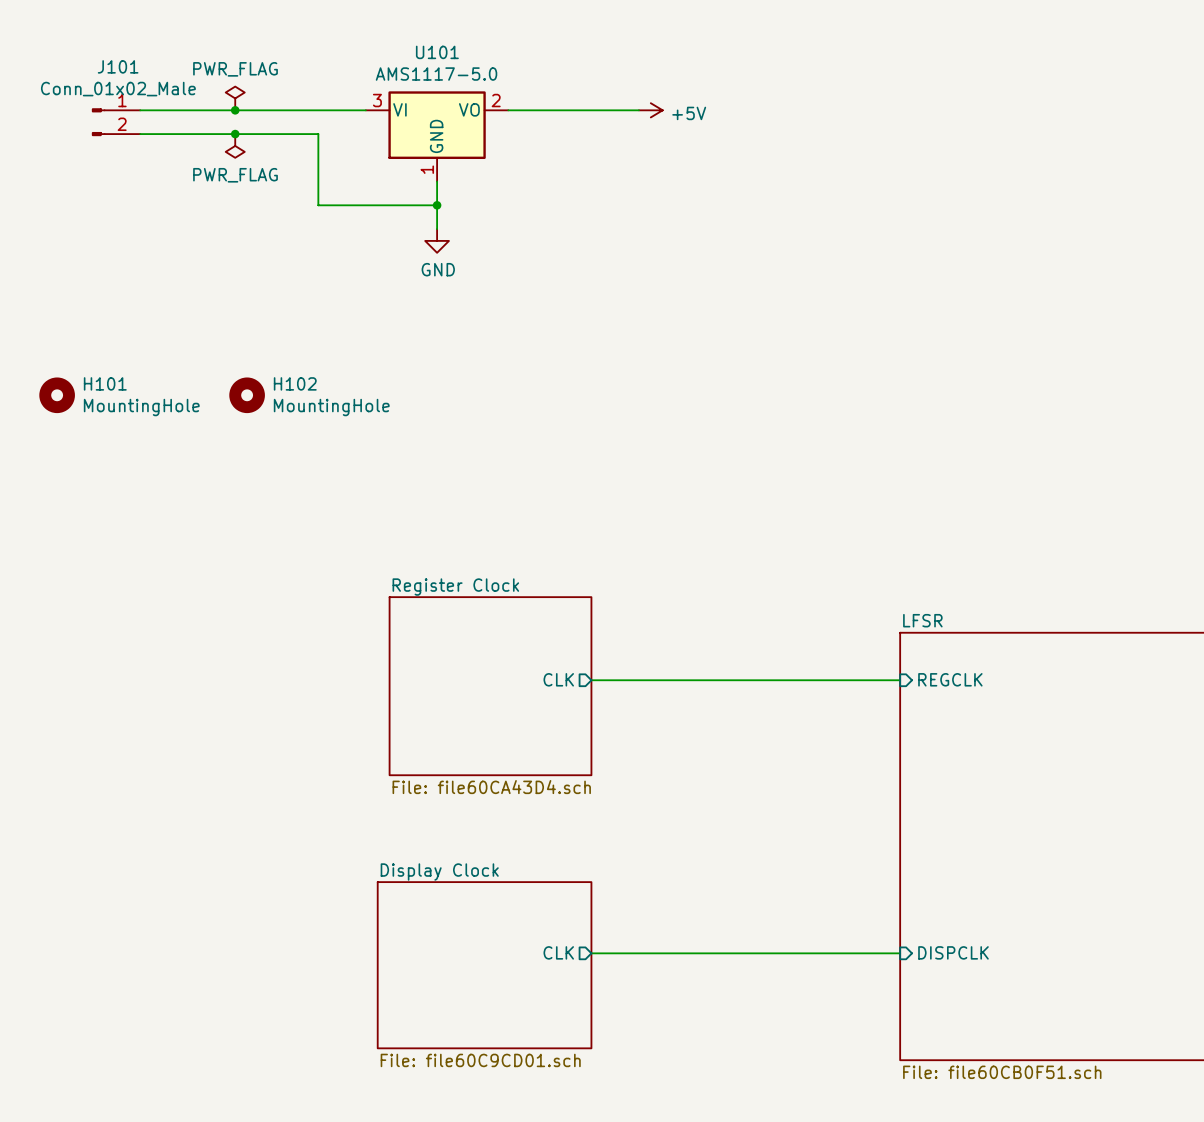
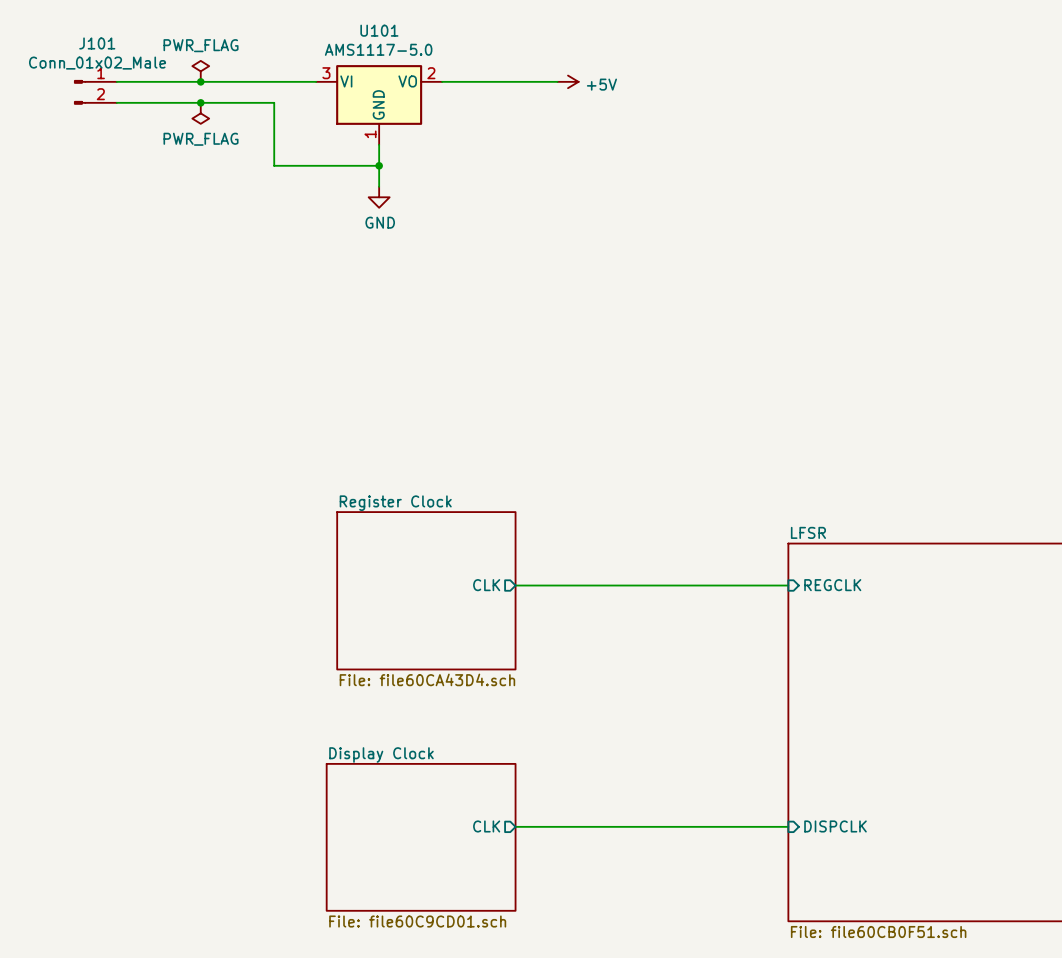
H101: MountingHole (57, 395) -> none
H102: MountingHole (247, 395) -> none

